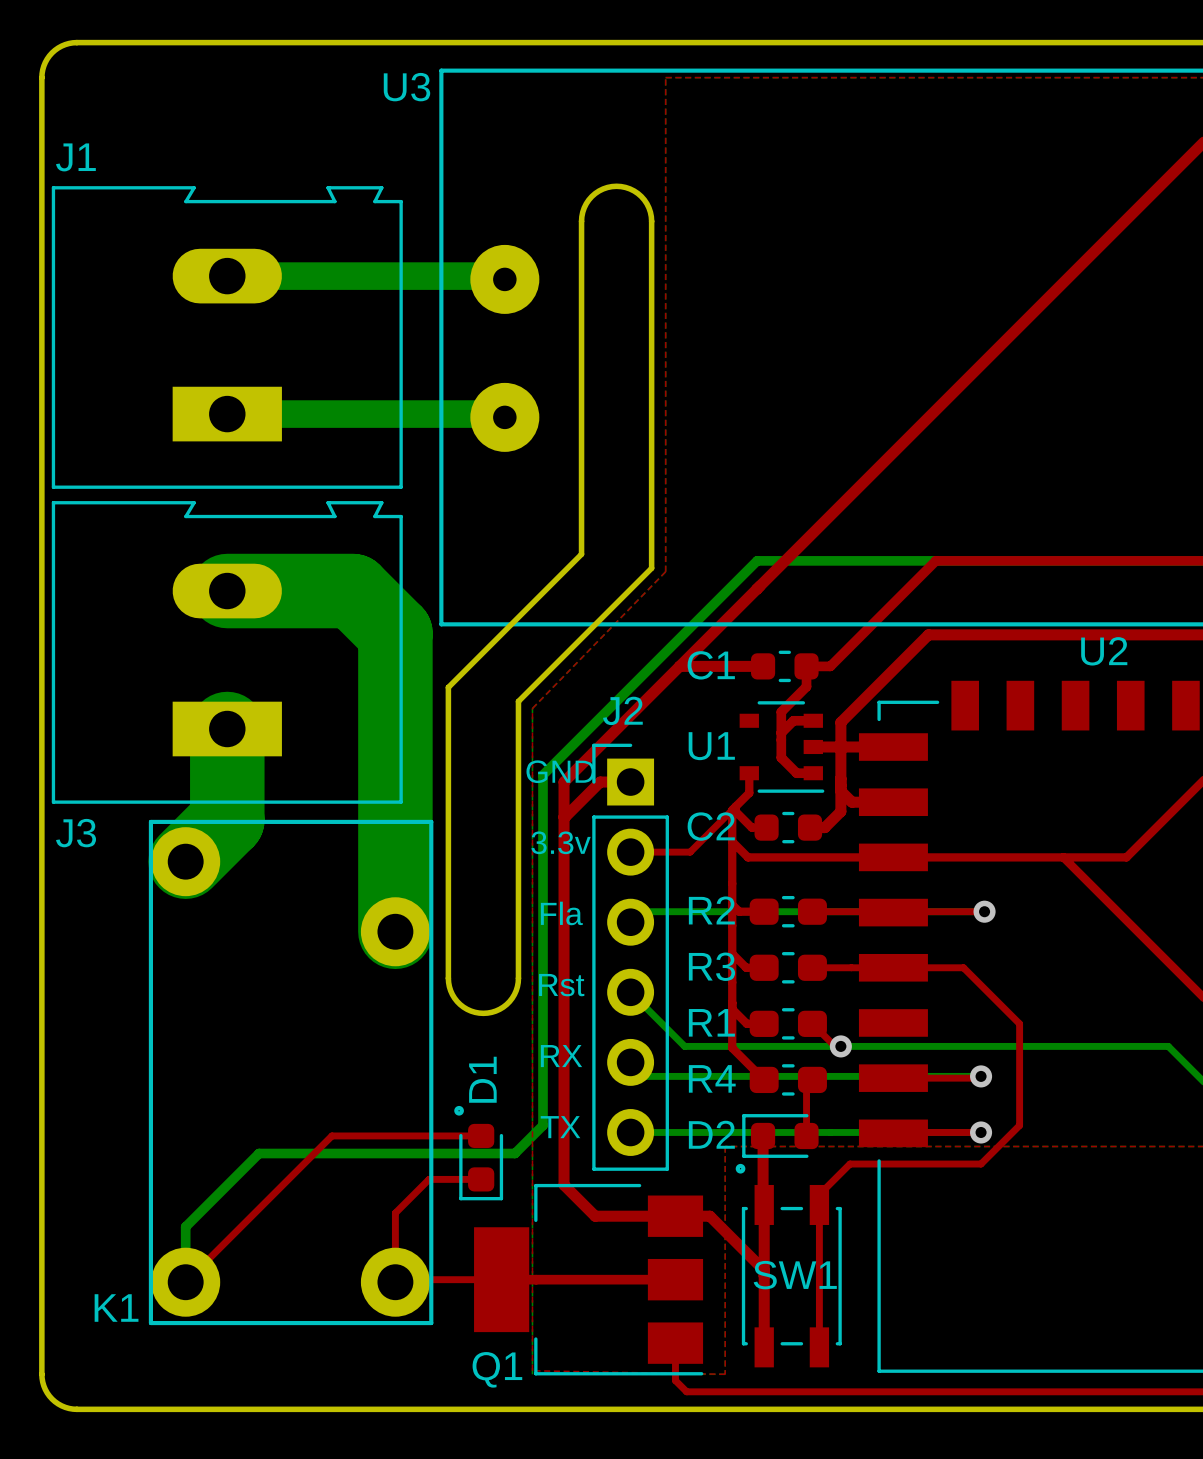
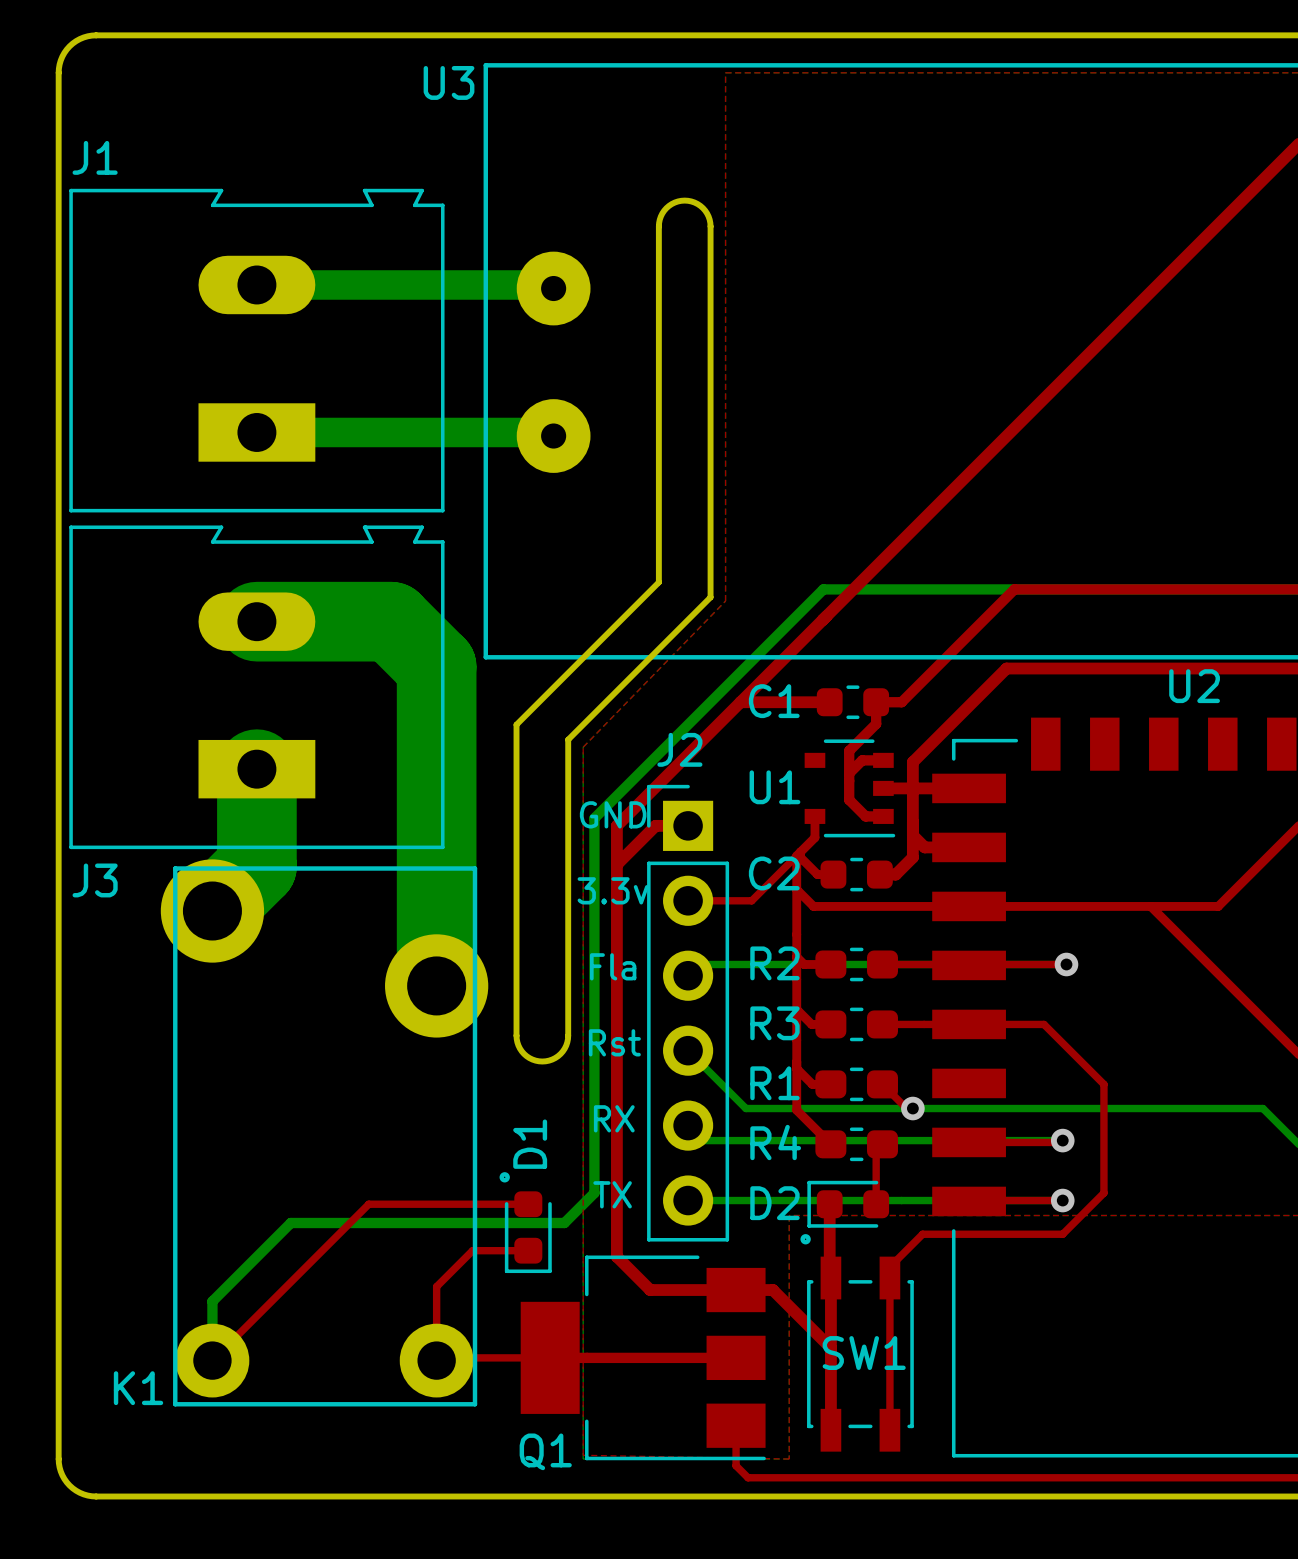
board edge: (651, 221) (650, 212) (644, 199) (634, 190) (621, 186) (612, 186) (599, 190) (588, 199) (582, 212) (581, 554) (448, 687) (449, 986) (454, 998) (463, 1007) (475, 1012) (487, 1013) (499, 1009) (509, 1001) (516, 990) (518, 978) -> (710, 226) (705, 210) (697, 204) (688, 200) (678, 201) (668, 205) (662, 213) (659, 223) (658, 582) (516, 724) (516, 1039) (524, 1053) (532, 1059) (542, 1061) (552, 1059) (560, 1053) (566, 1045) (568, 1035)
K1 footprint: [148, 819, 434, 1326] -> [160, 859, 489, 1407]

